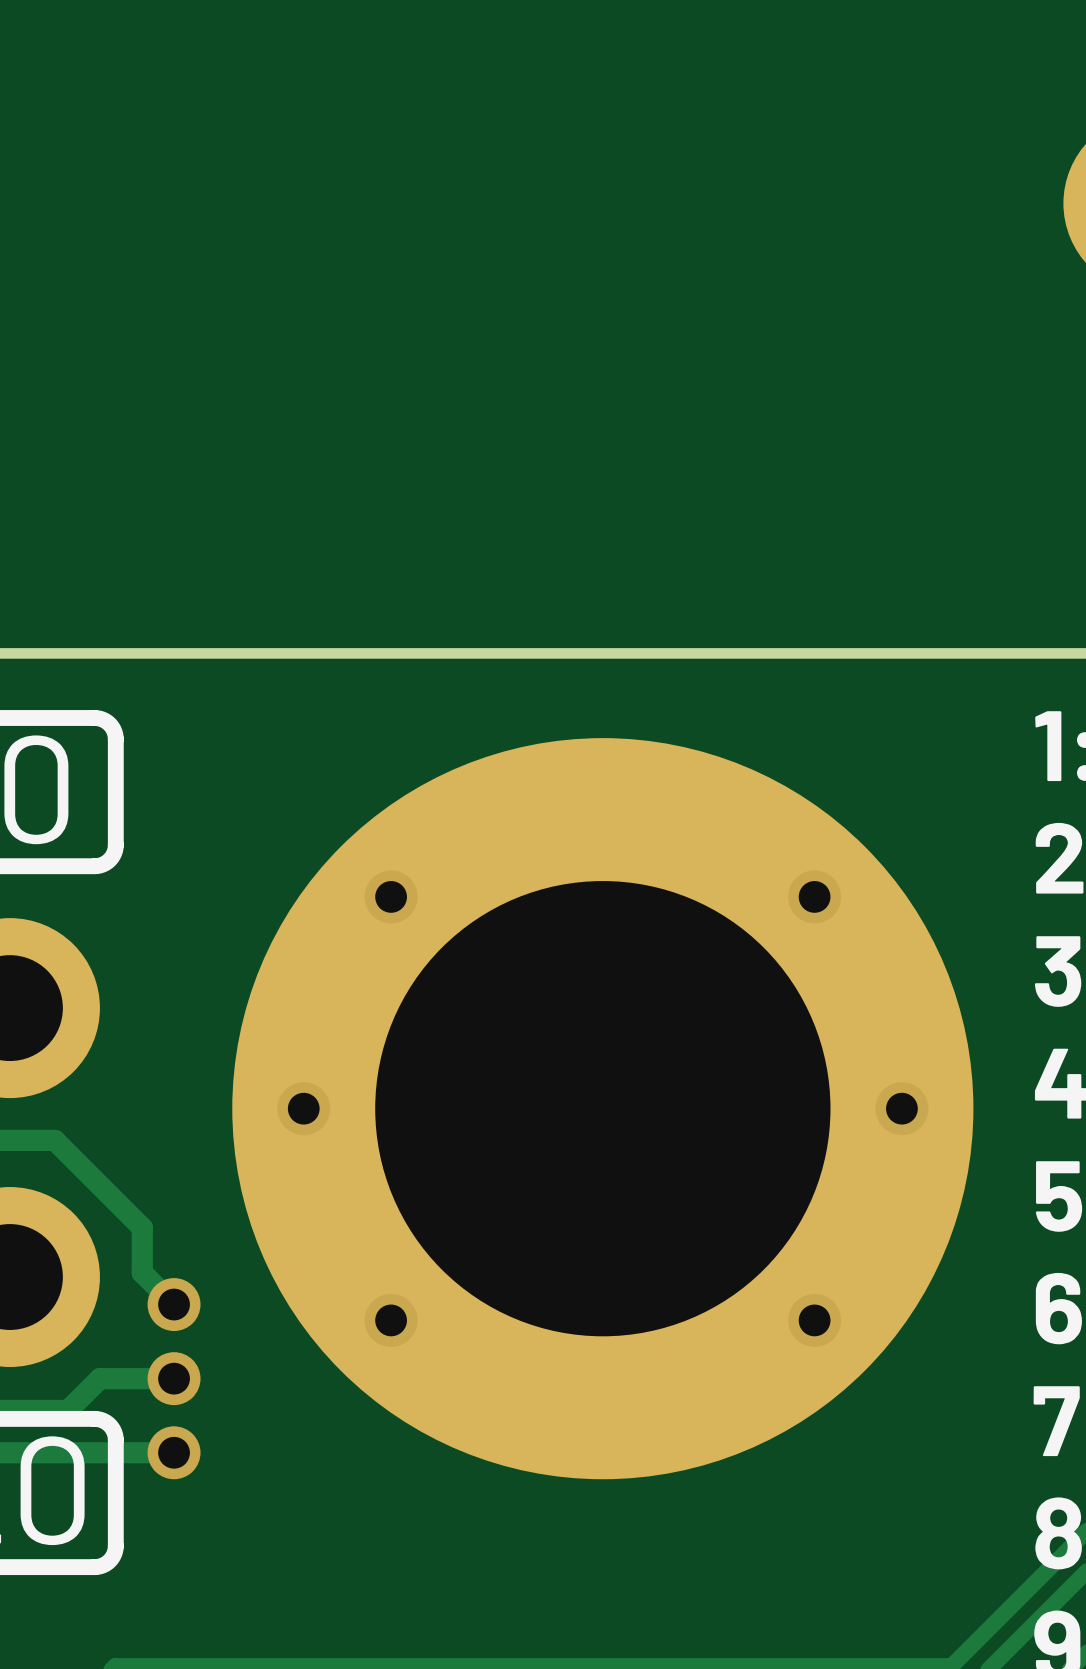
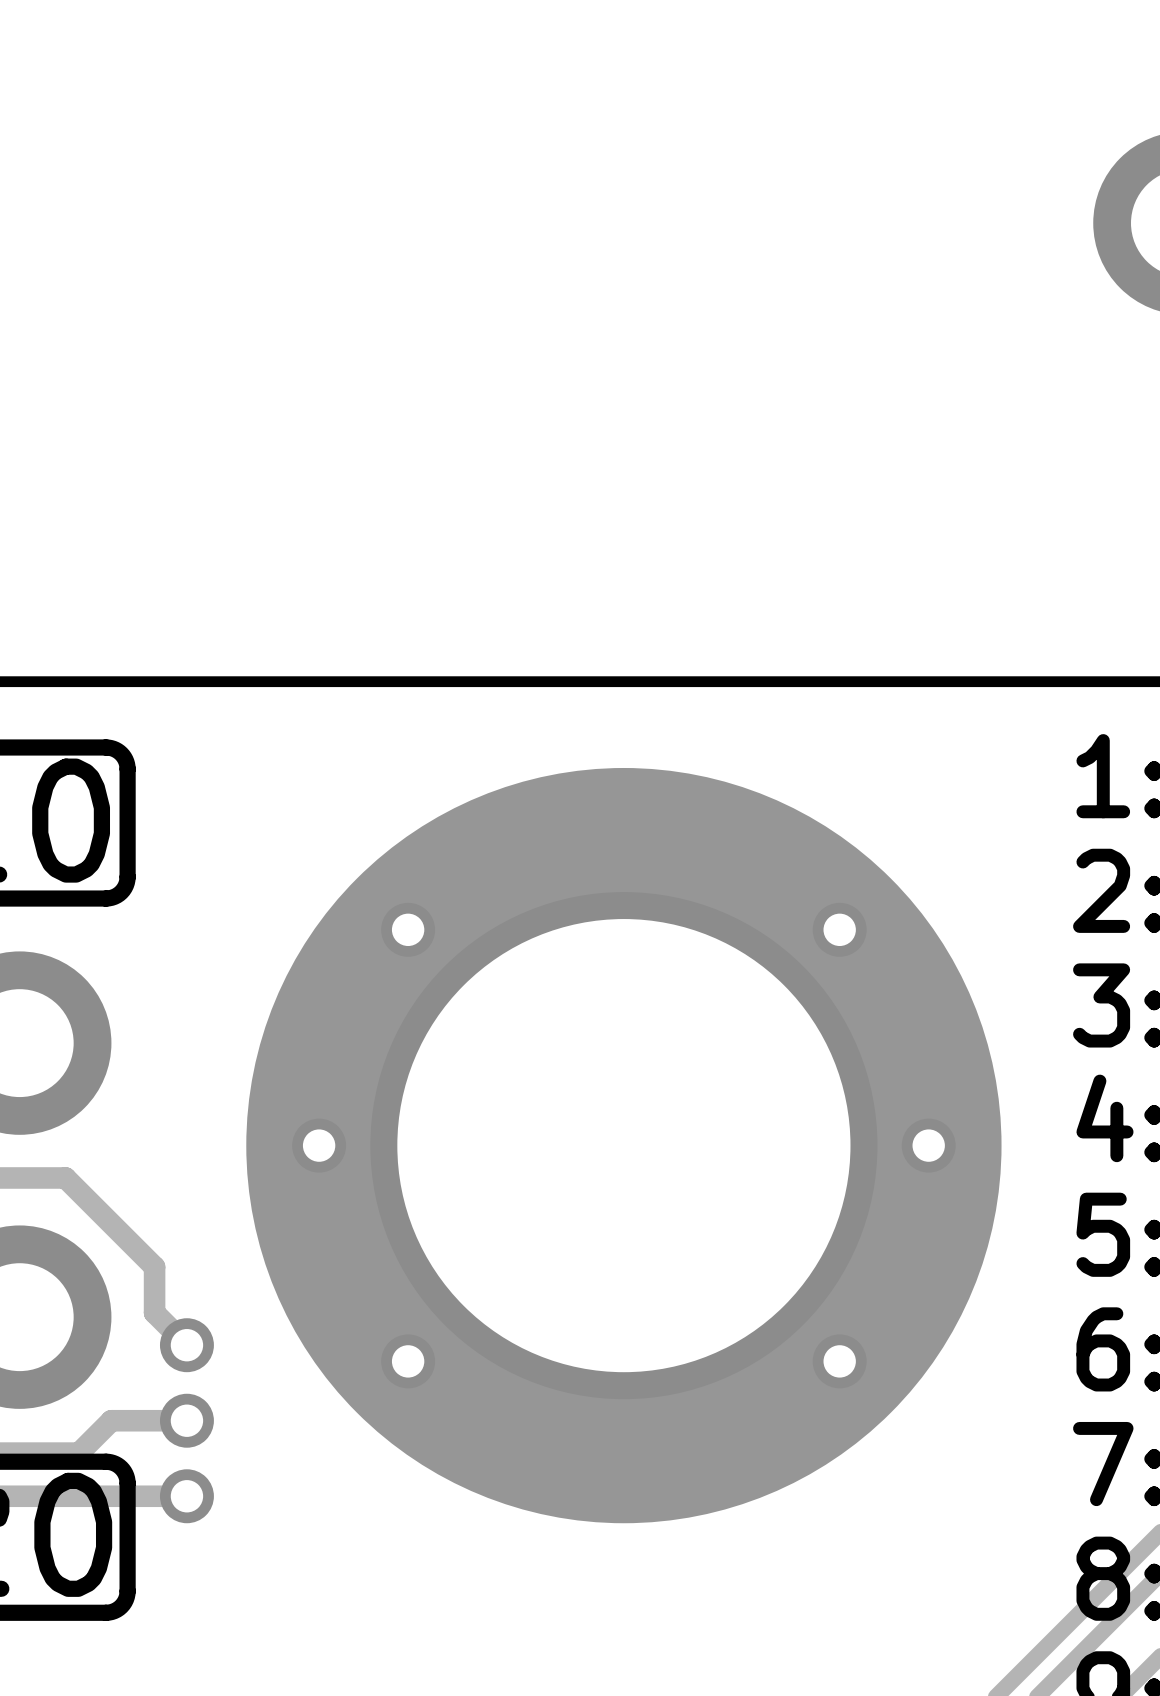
part footprint: [232, 738, 974, 1480] -> [246, 767, 1002, 1524]

